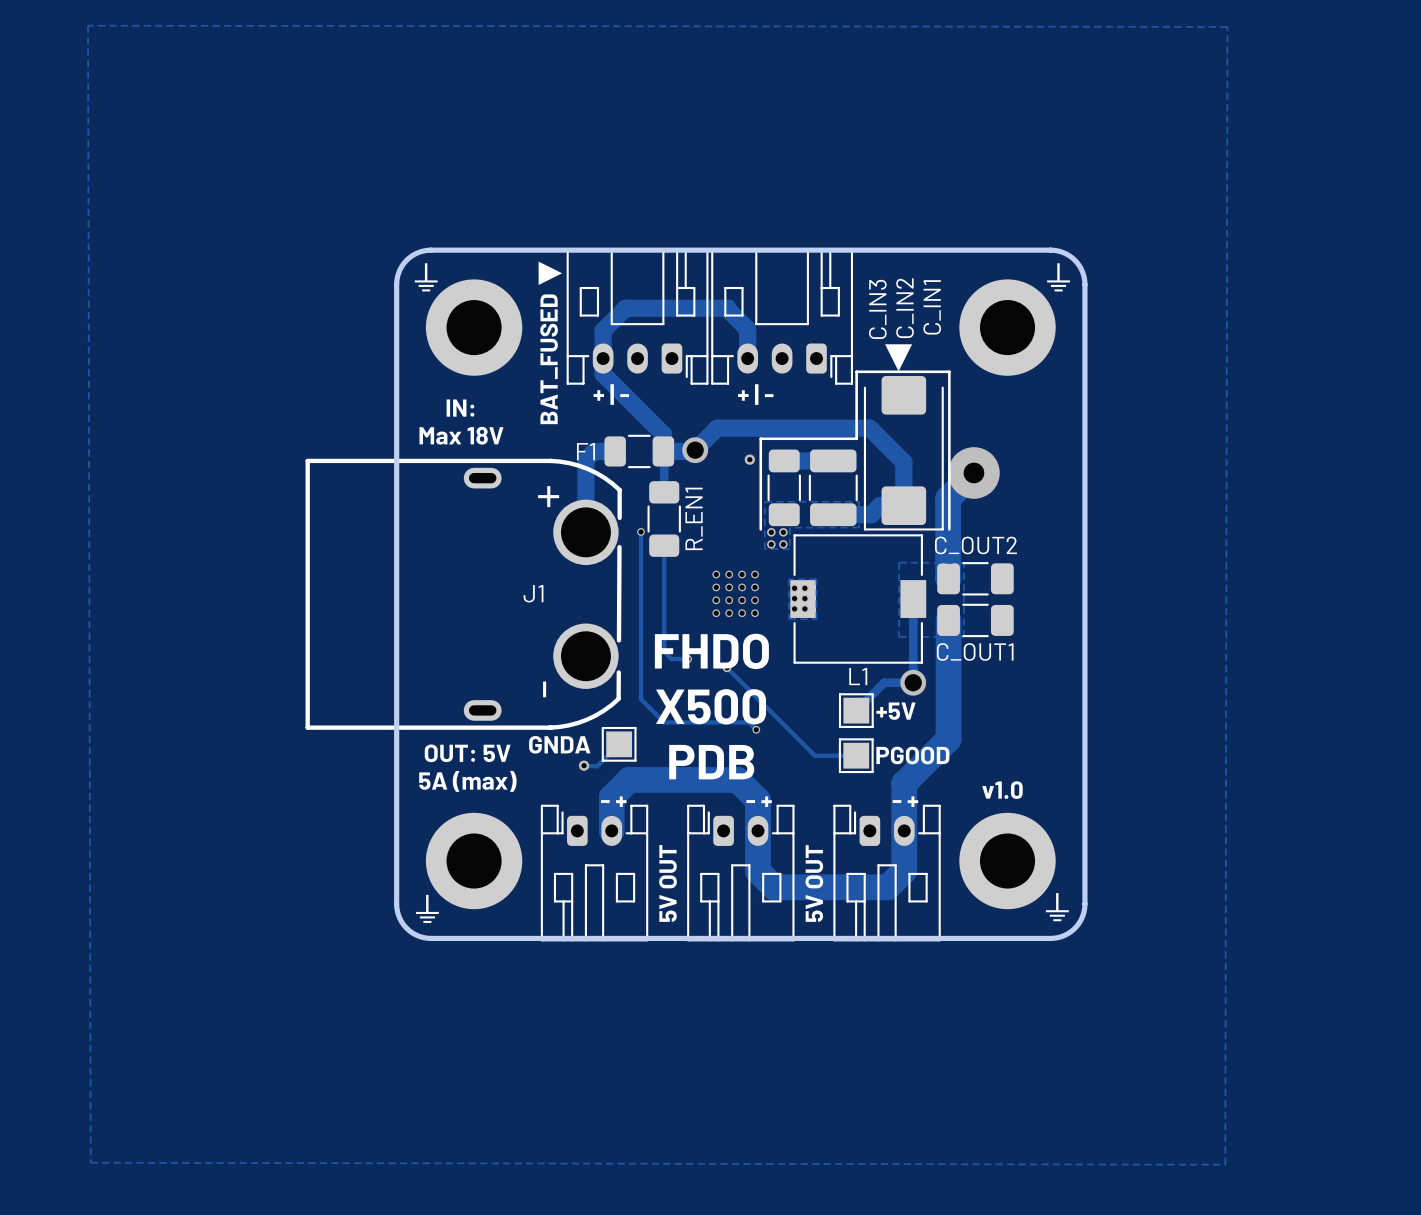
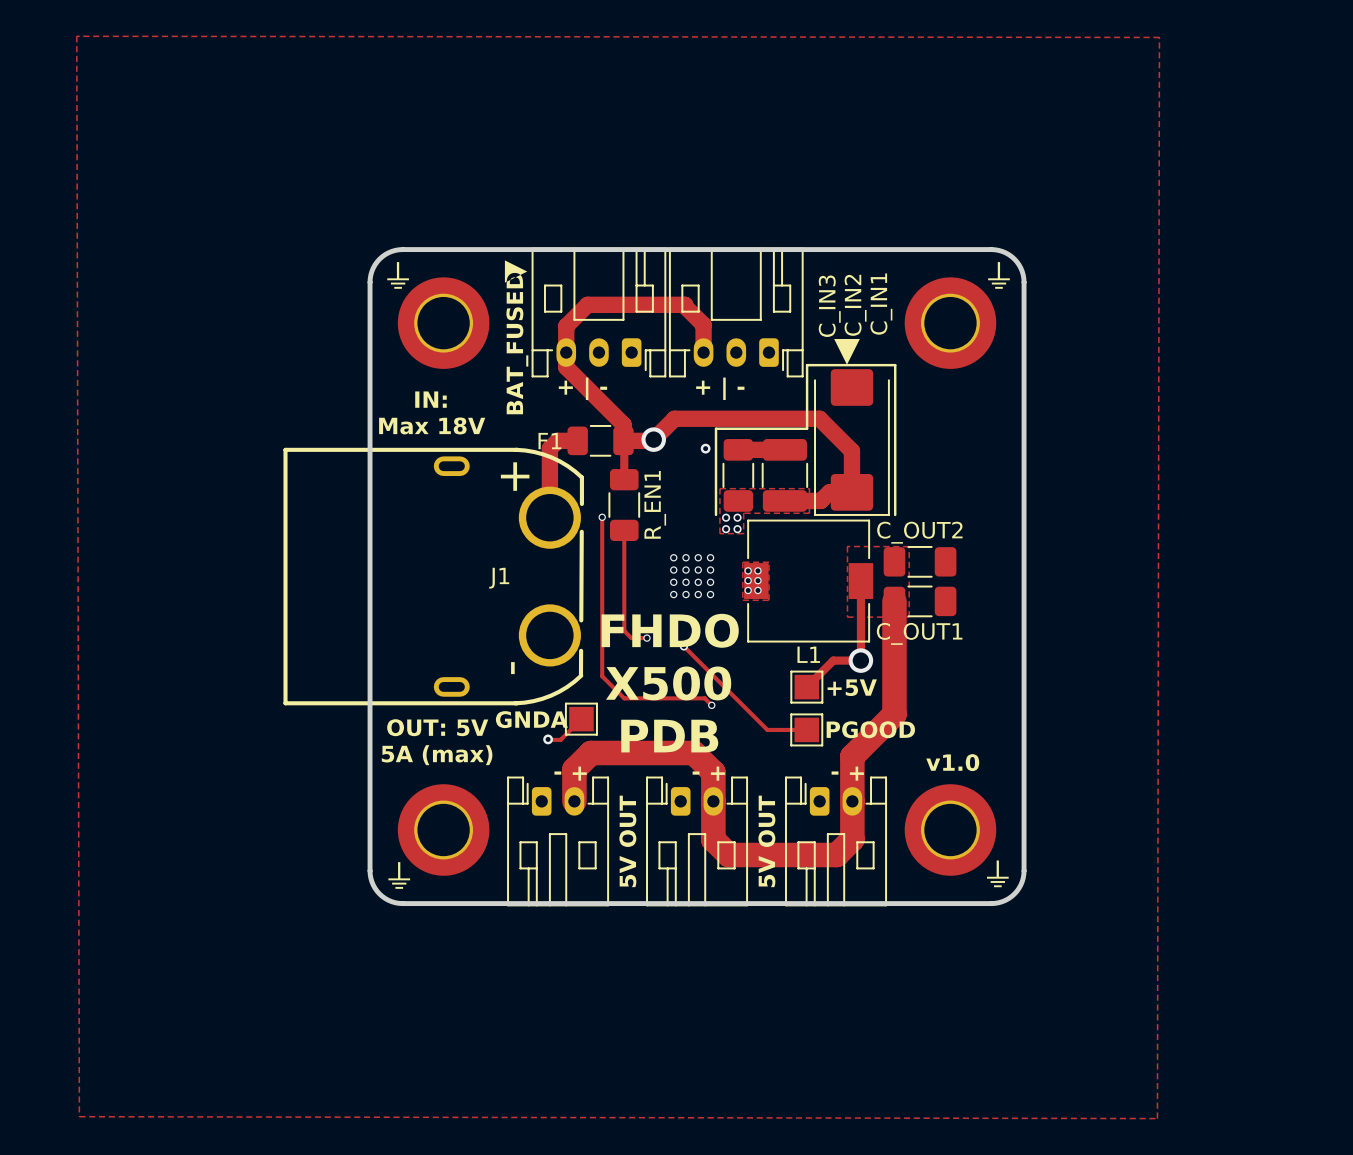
track: (973, 472) (948, 498) (948, 578) -> none
via: (973, 472) -> none

